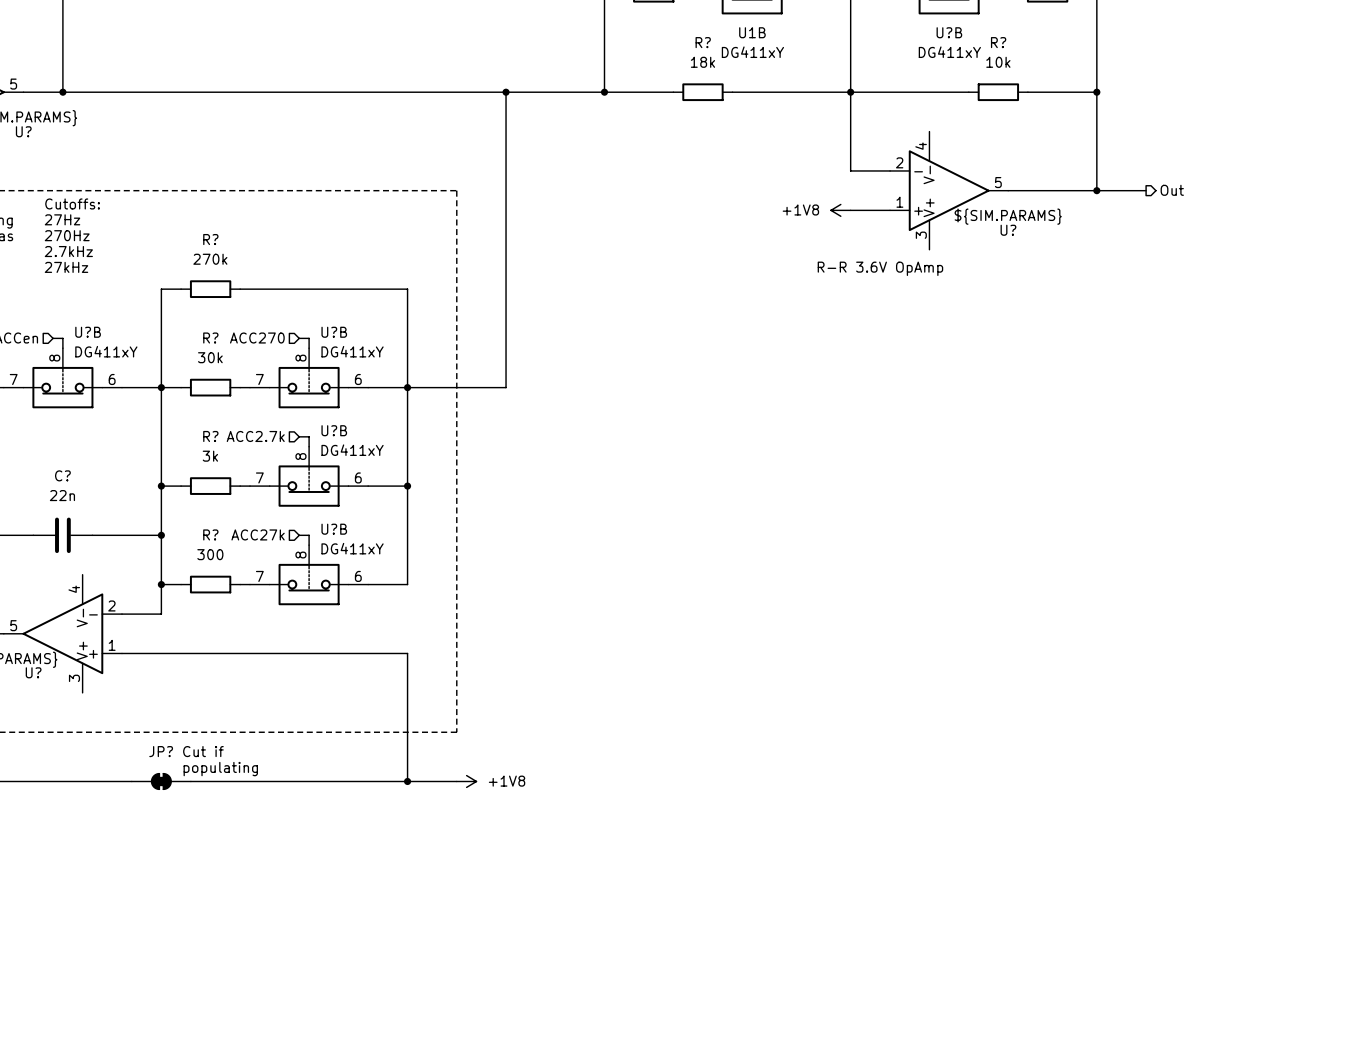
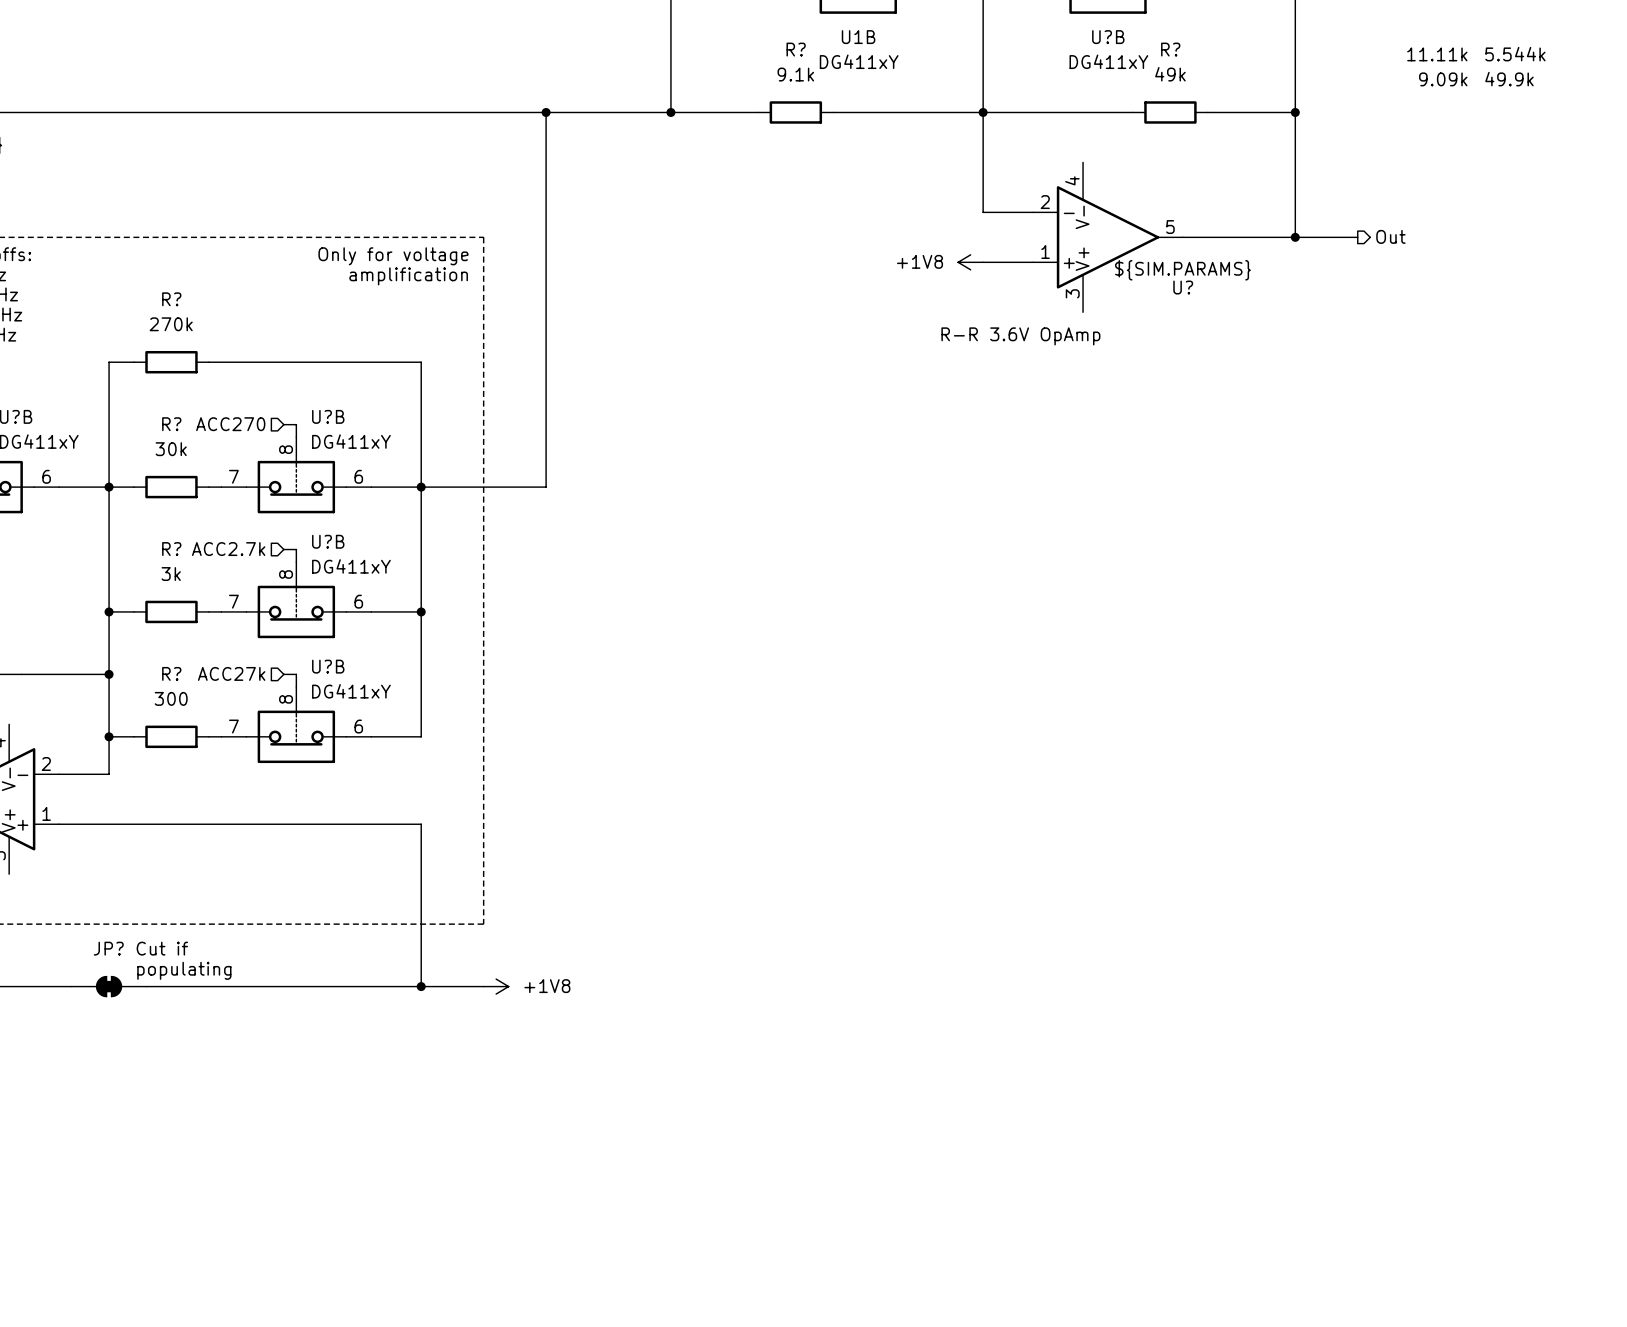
text: none -> 11.11k (1437, 54)
text: none -> 5.544k (1515, 54)
R? value: 18k (702, 62) -> 9.1k (795, 74)
R? value: 10k (998, 62) -> 49k (1170, 74)
text: none -> 49.9k (1509, 79)
text: none -> 9.09k (1443, 79)
text: none -> Only for voltage (393, 256)
text: none -> amplification (408, 276)

